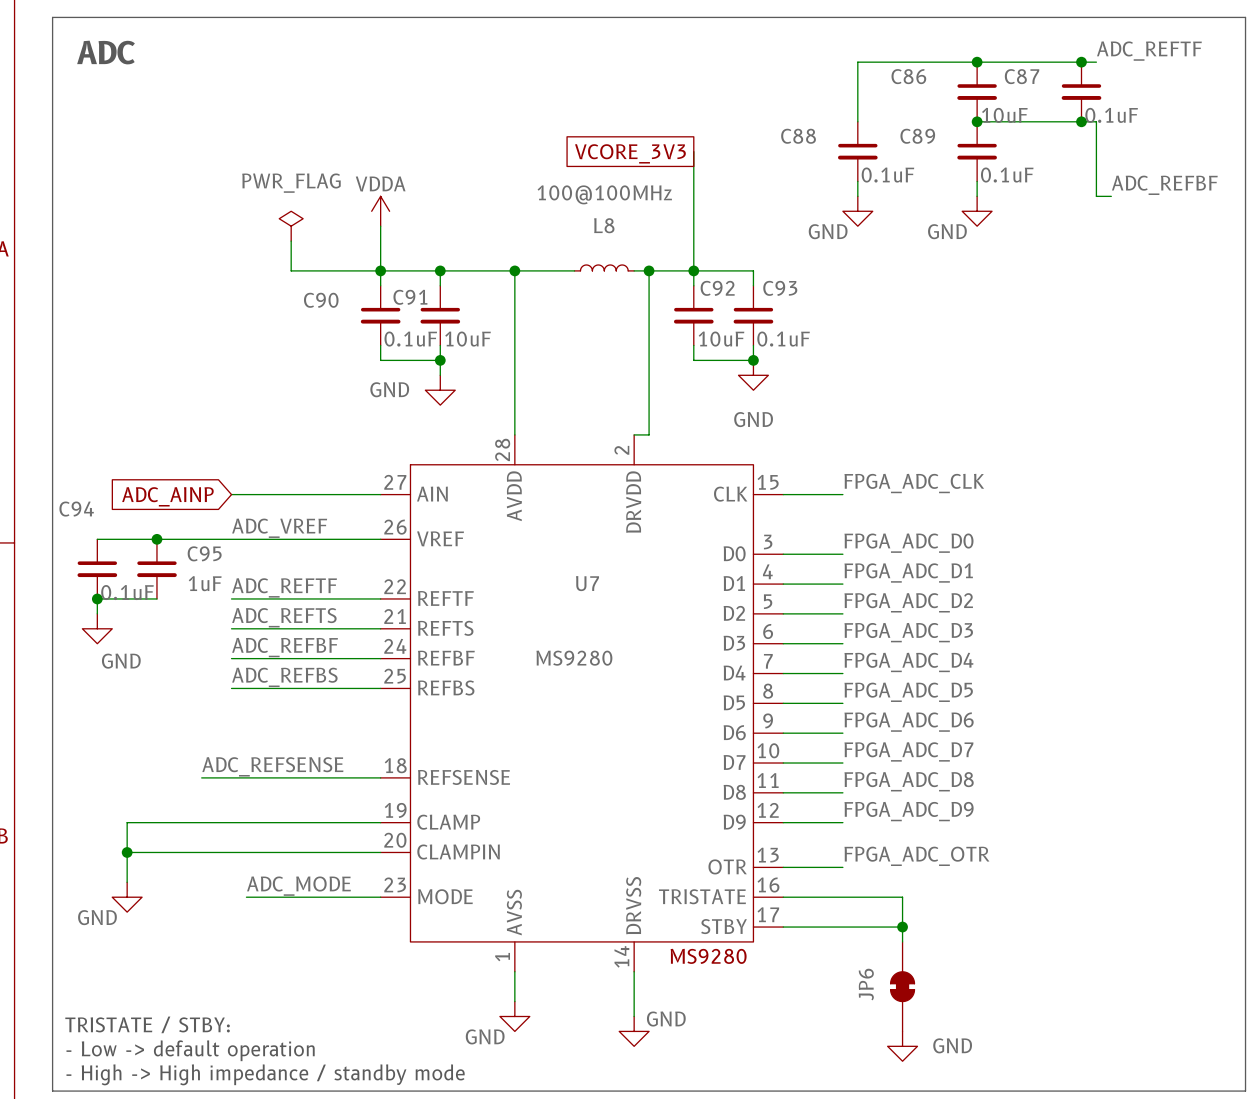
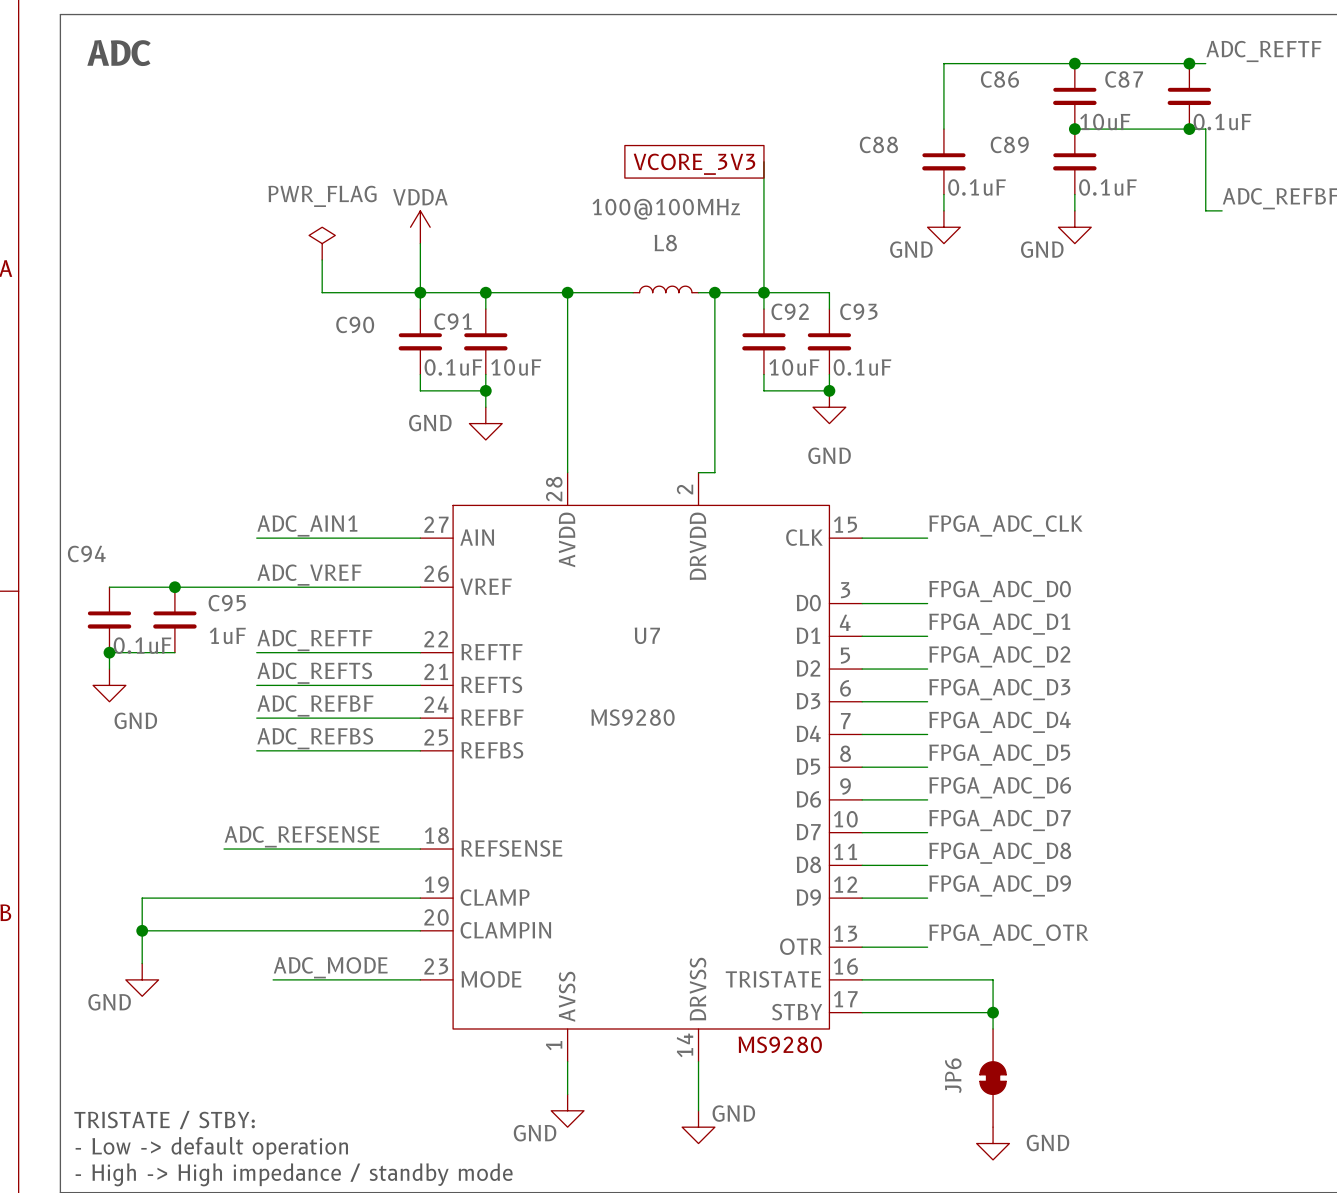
label: none -> ADC_AIN1 (307, 525)
global label: ADC_AINP (167, 496) -> none

